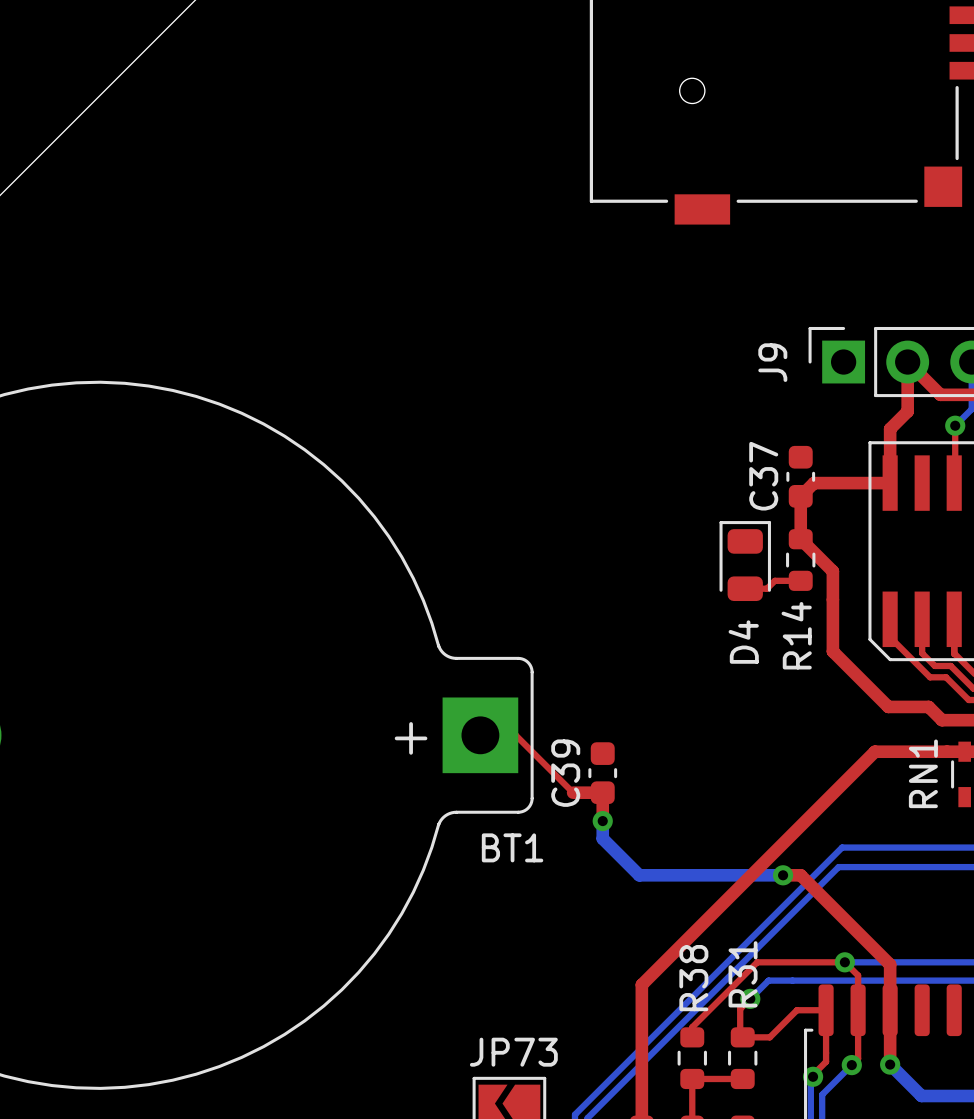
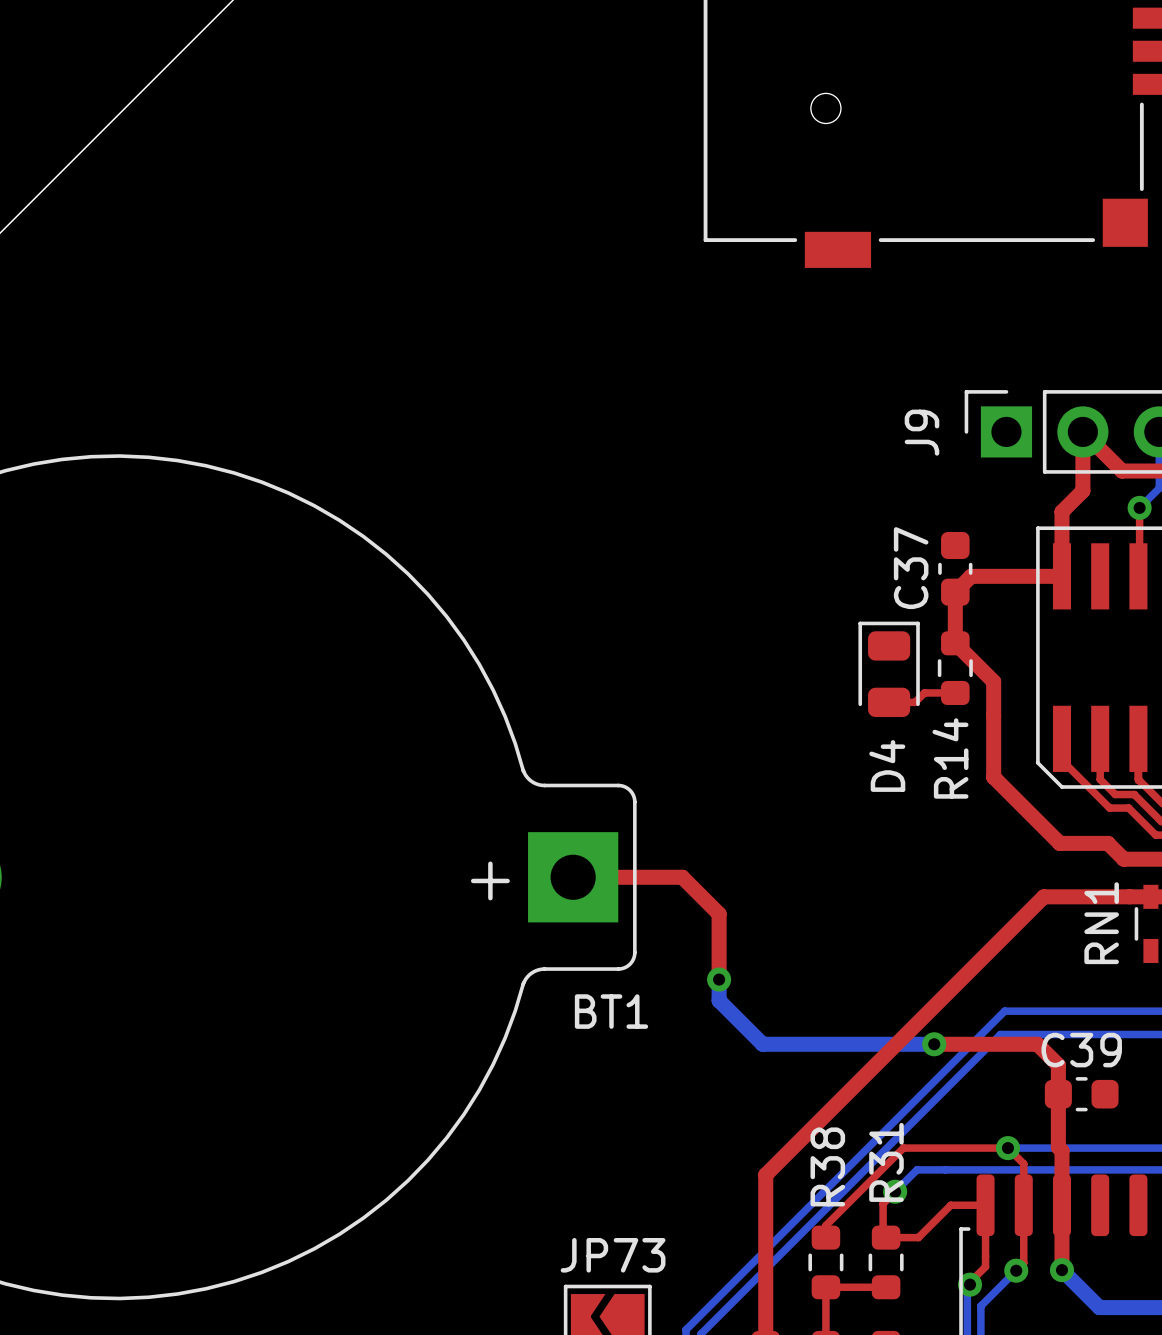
top track: (515, 735) (573, 792) (602, 792) -> (573, 877) (682, 877) (719, 913) (719, 945)
C39 rotation: 0° (602, 773) -> 90° clockwise (1081, 1094)
C39 position: (602, 773) -> (1081, 1094)
top track: (800, 875) (887, 961) -> (955, 1044) (1037, 1044) (1058, 1065) (1058, 1147)

